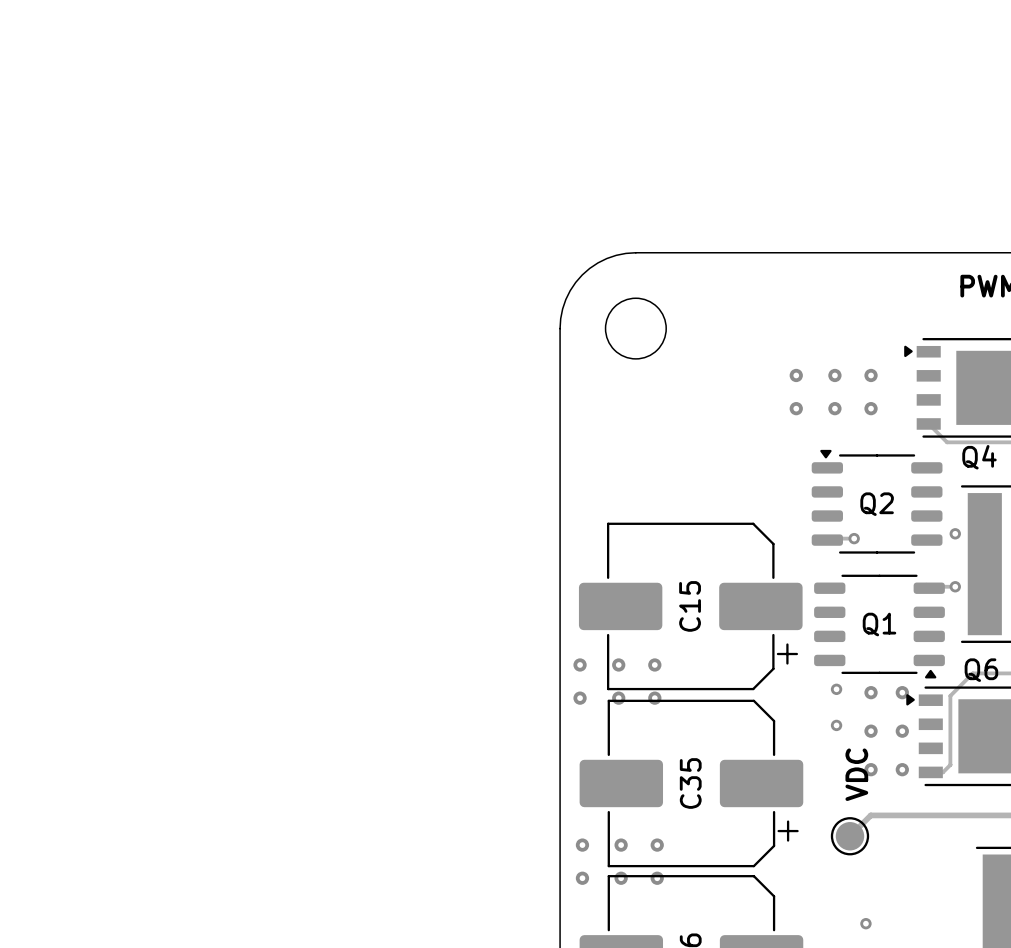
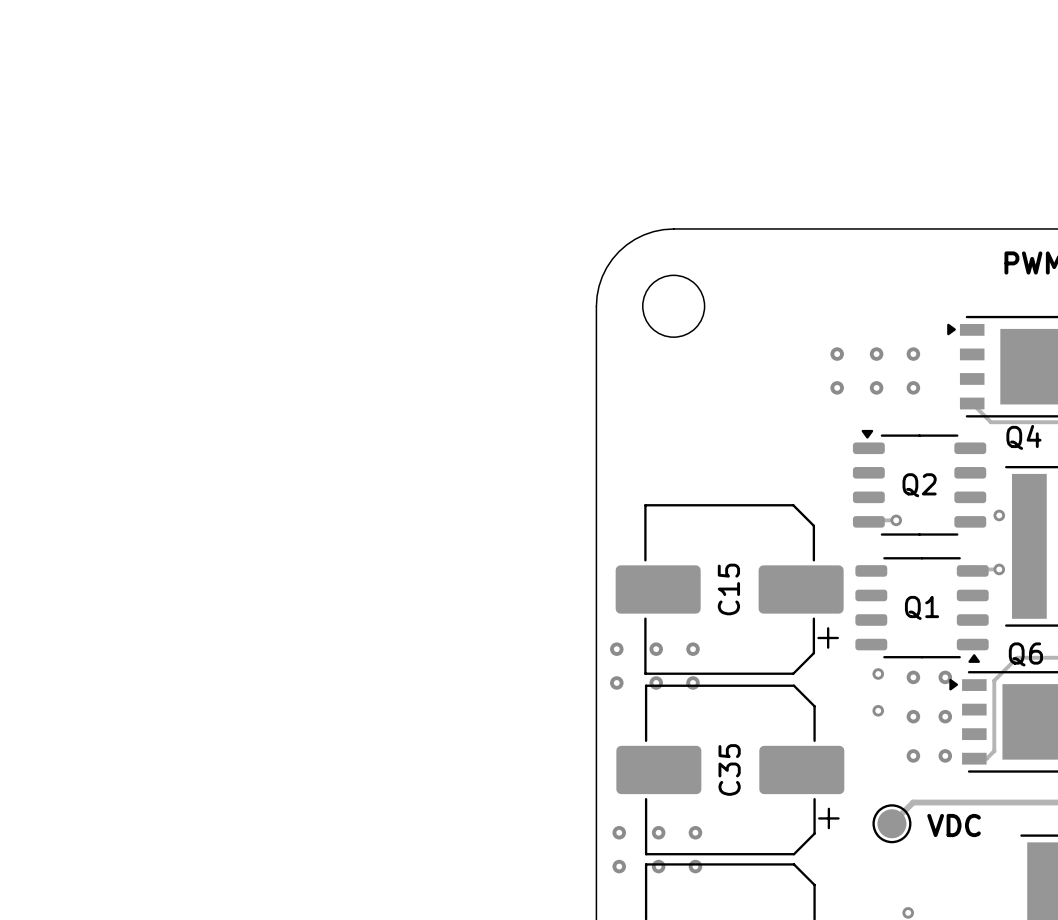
text rotation: 0° (856, 774) -> 90° clockwise (954, 825)
text position: VDC (856, 774) -> VDC (954, 825)

